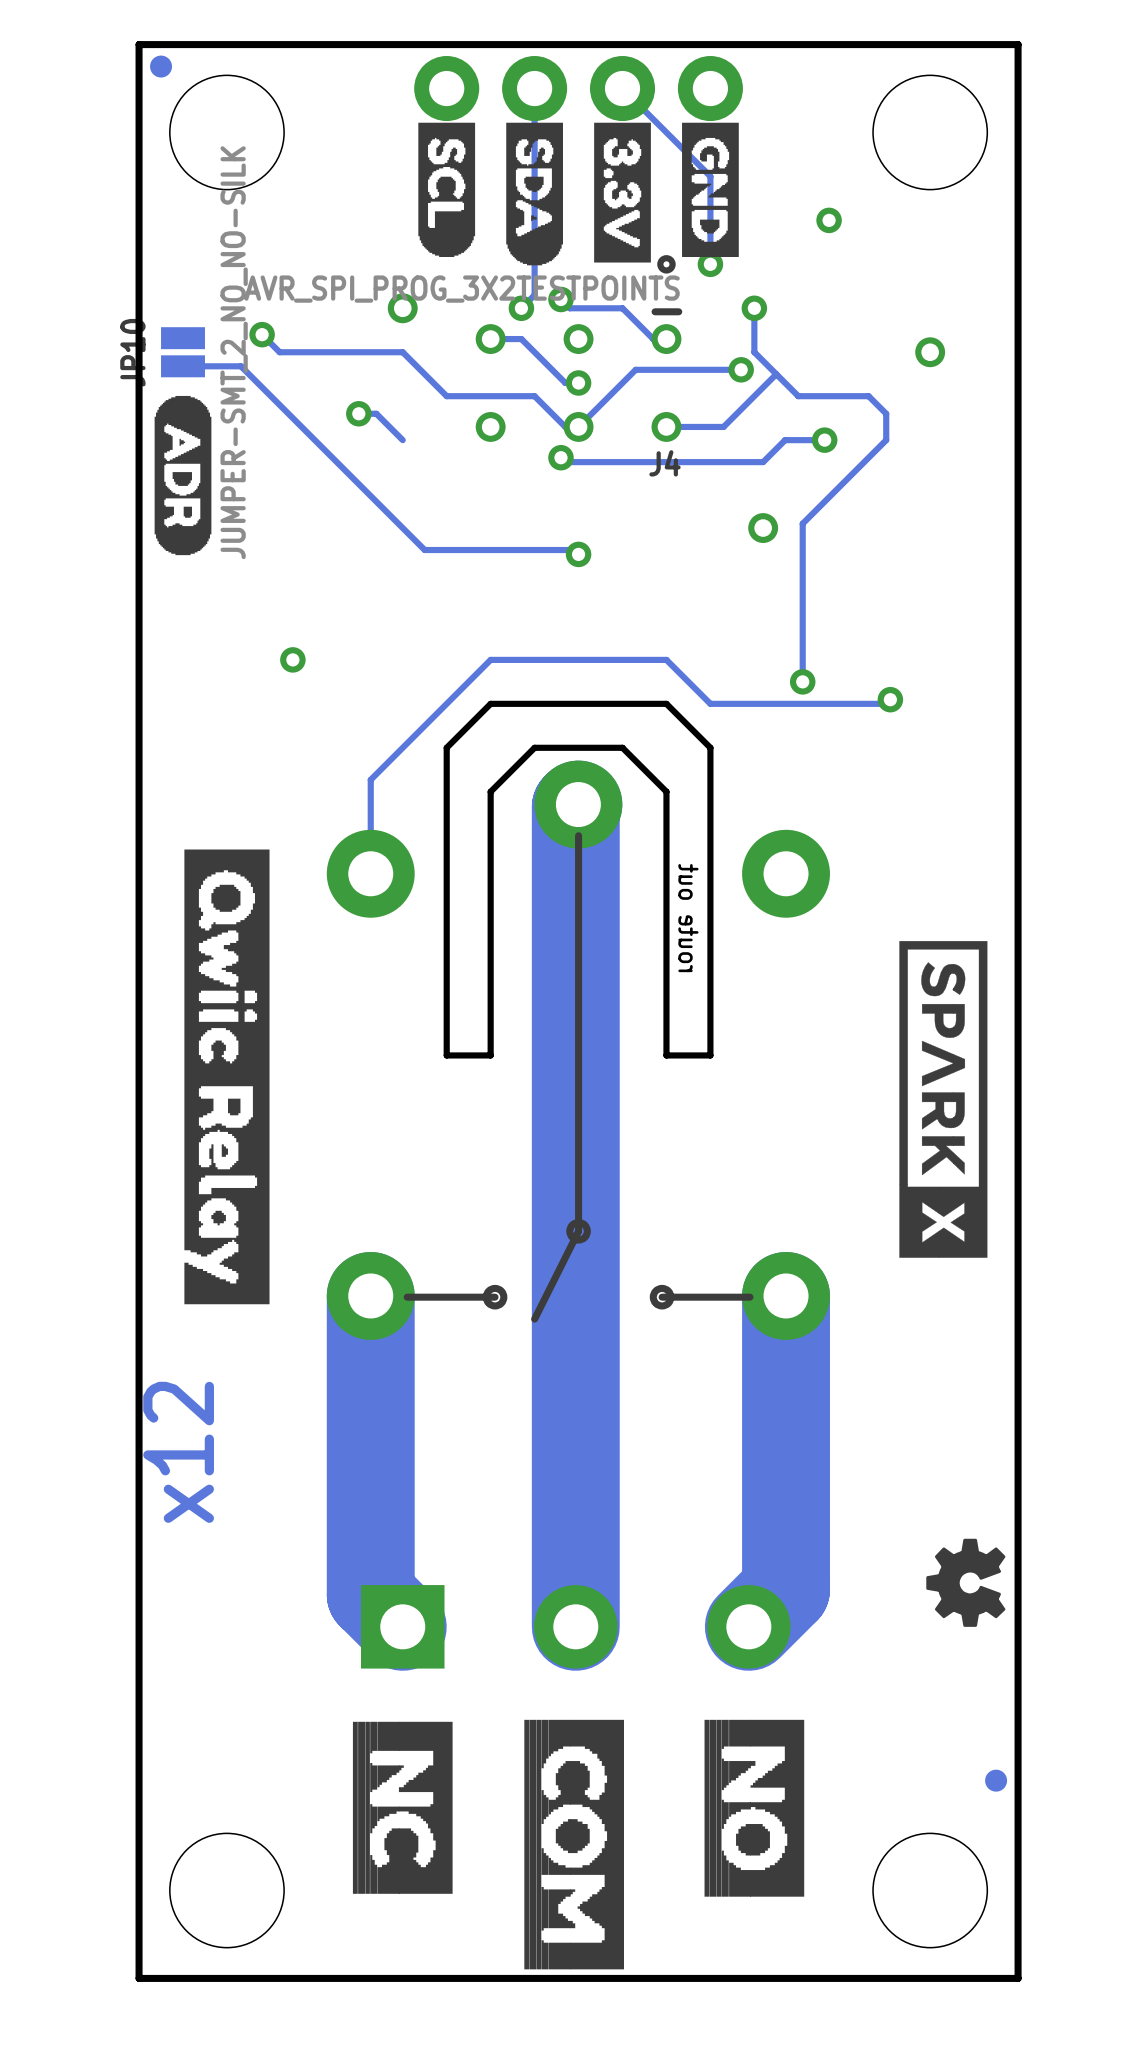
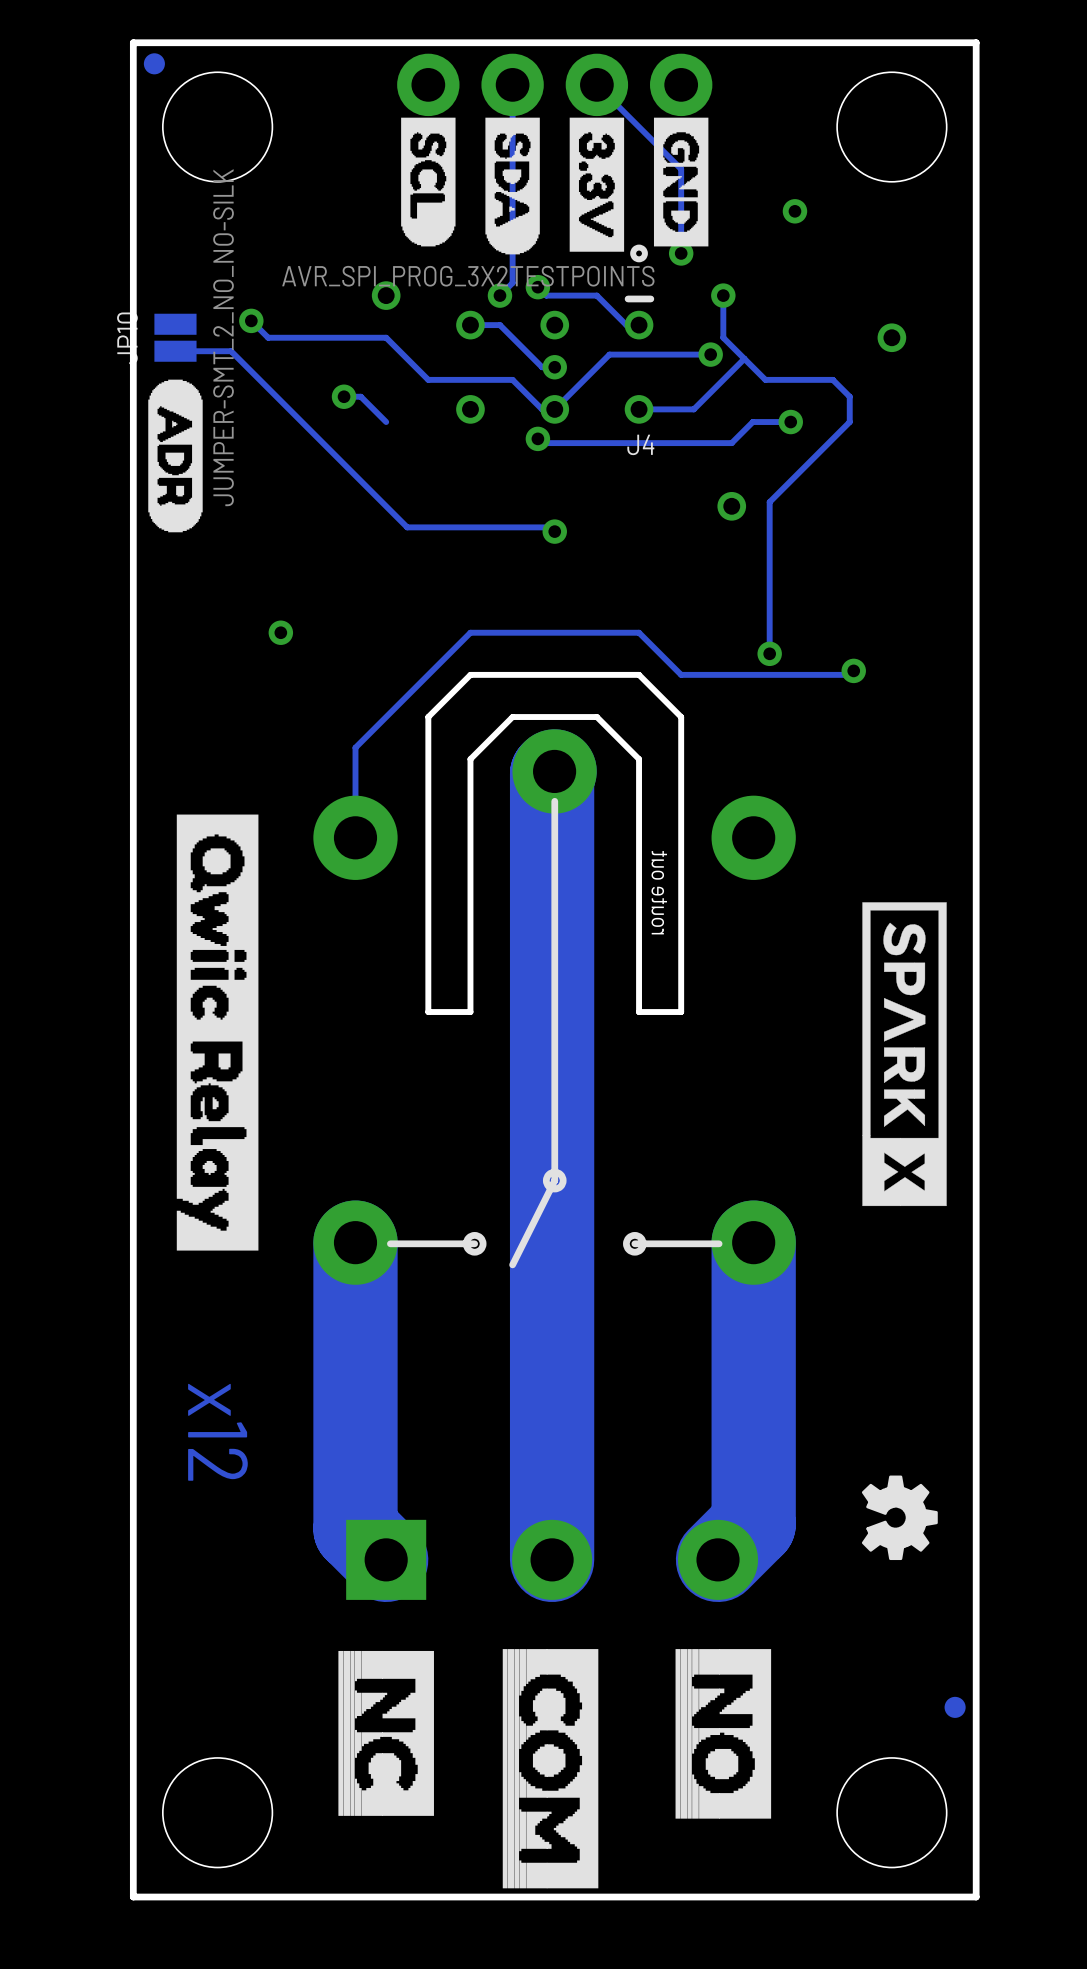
text rotation: 0° (178, 1452) -> 180° (217, 1432)
drawing shape: [926, 1538, 1006, 1627] -> [861, 1475, 938, 1561]

